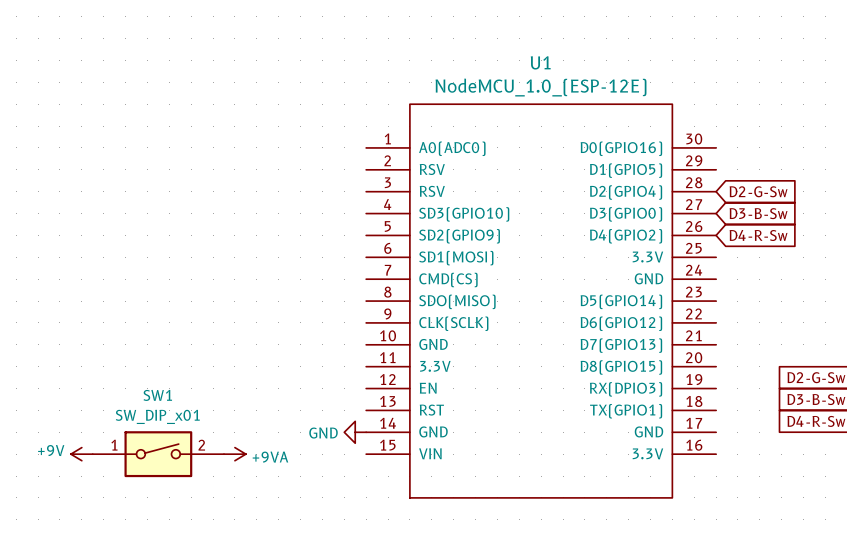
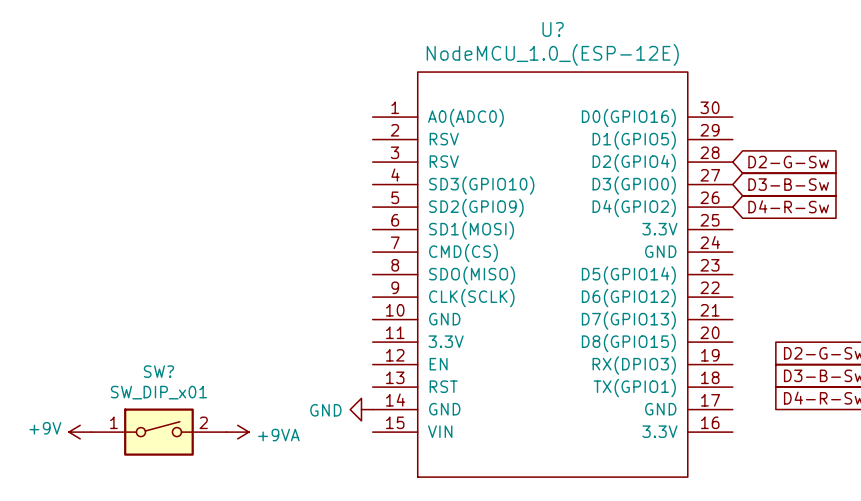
U1 name: U1 (540, 62) -> U? (553, 29)
SW1 name: SW1 (157, 395) -> SW? (158, 371)

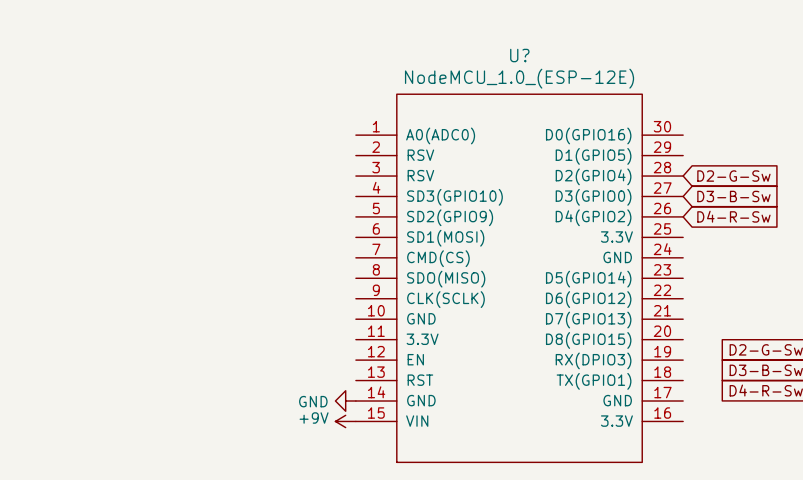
power symbol: +9V (80, 432) -> none
SW?: SW_DIP_x01 (158, 432) -> none
power symbol: +9VA (237, 432) -> none
power symbol: none -> +9V (345, 421)

